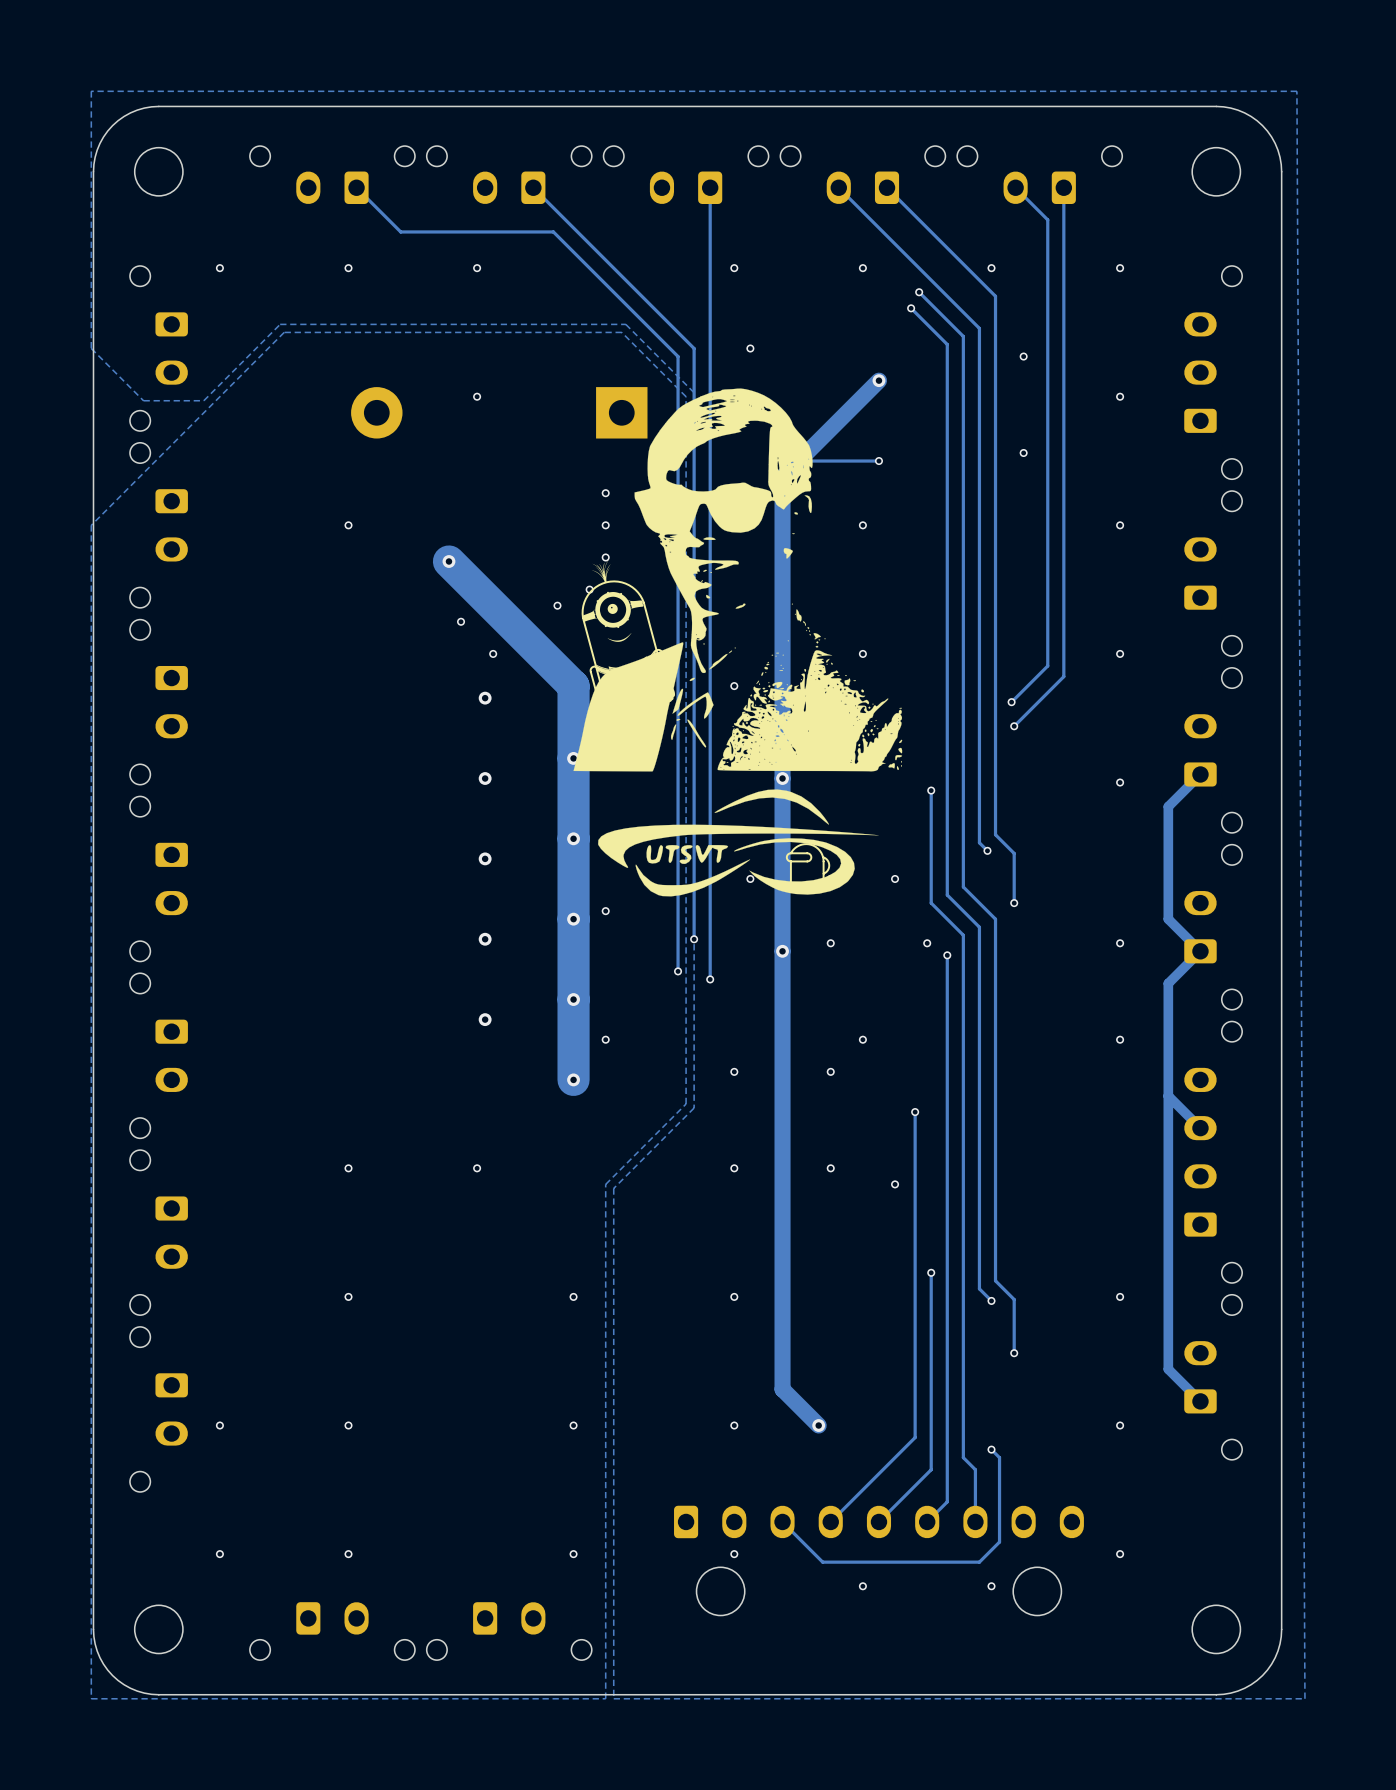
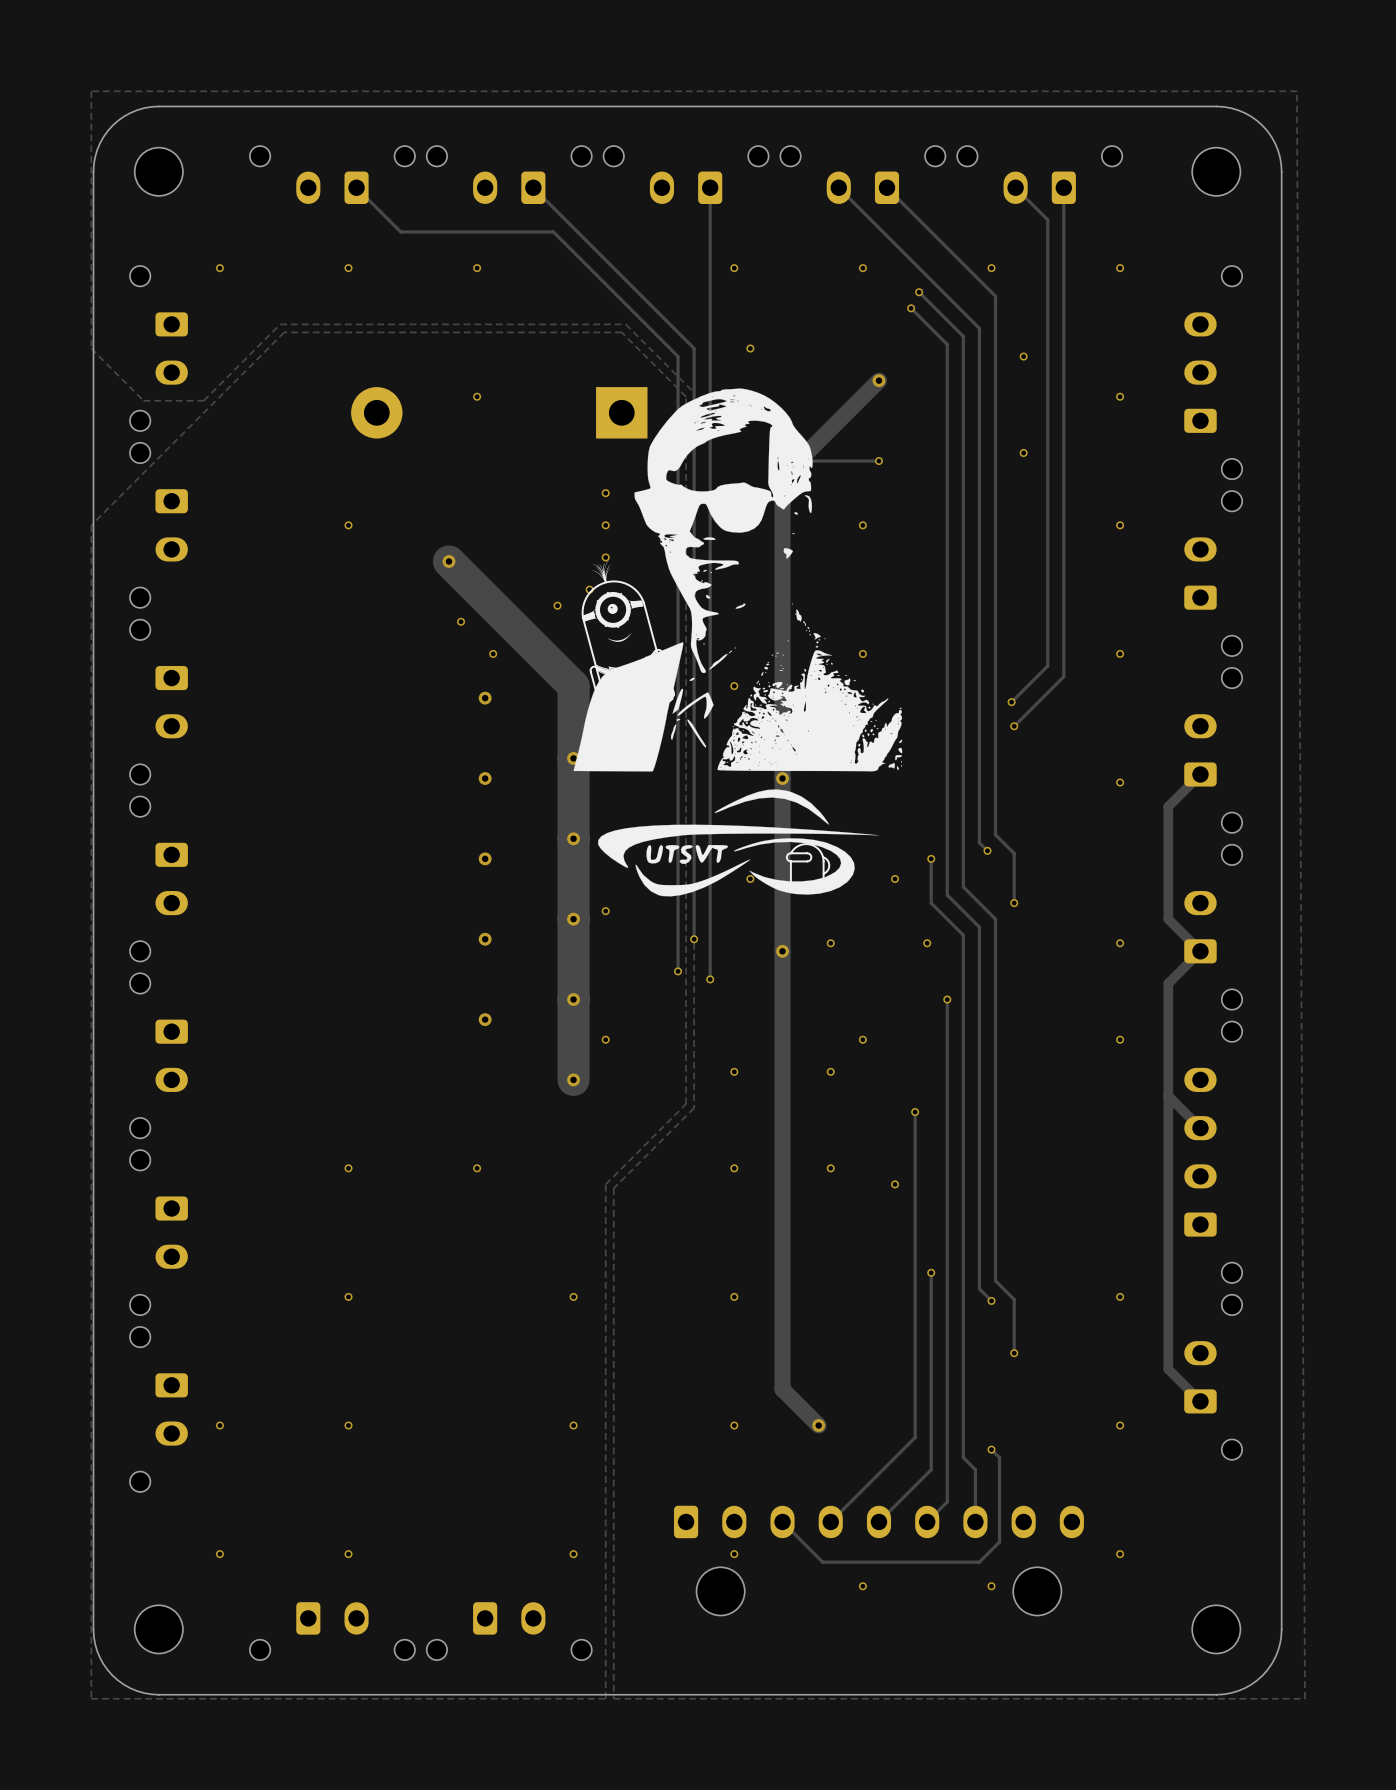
track: (931, 790) (931, 858) -> none
via: (931, 790) -> none
via: none -> (931, 858)
track: (947, 955) (947, 999) -> none
via position: (947, 955) -> (947, 999)

